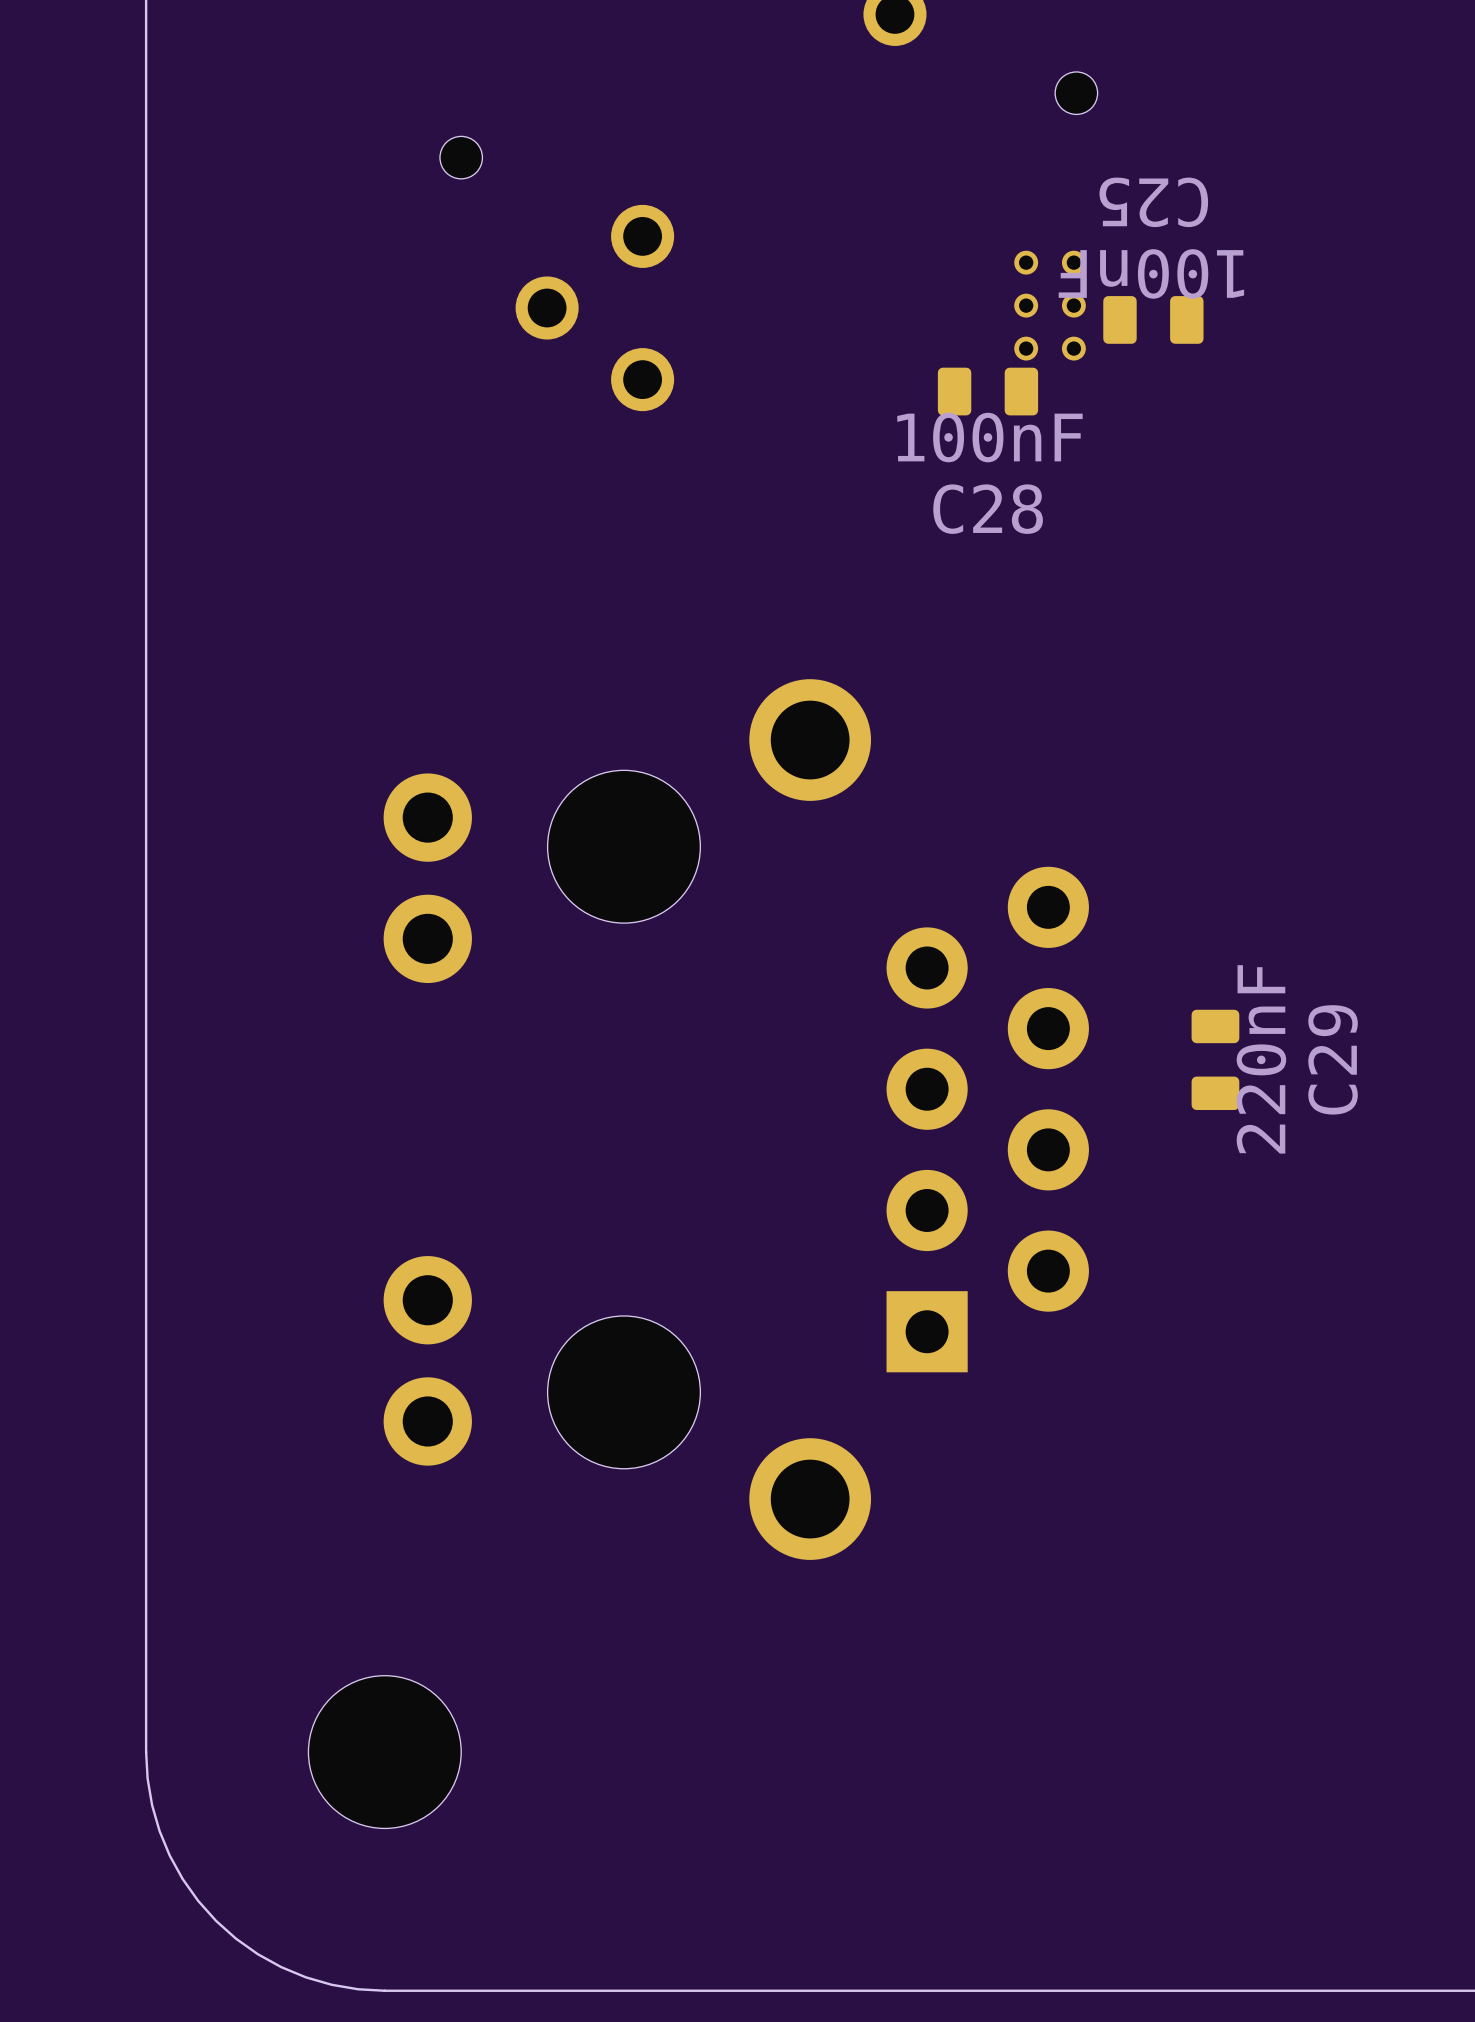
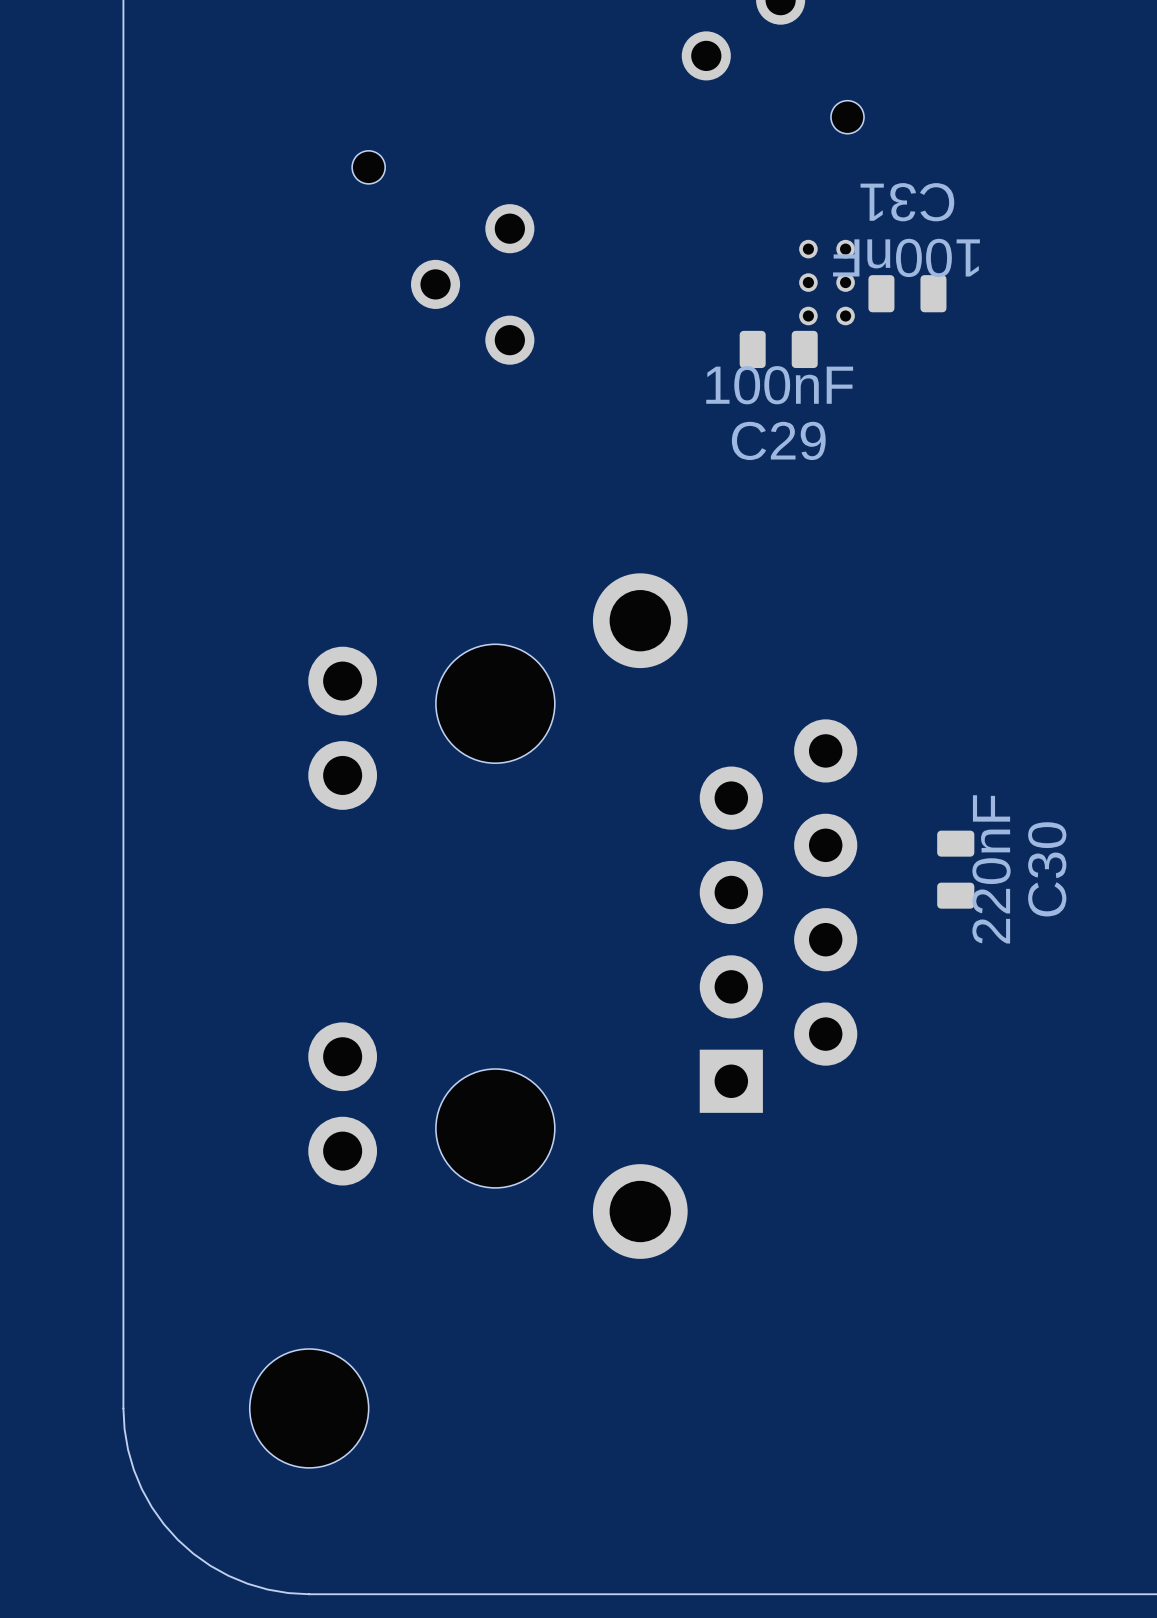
C25 name: C25 (1153, 202) -> C31 (907, 202)
C28 name: C28 (988, 509) -> C29 (778, 440)
C29 name: C29 (1333, 1059) -> C30 (1047, 869)

